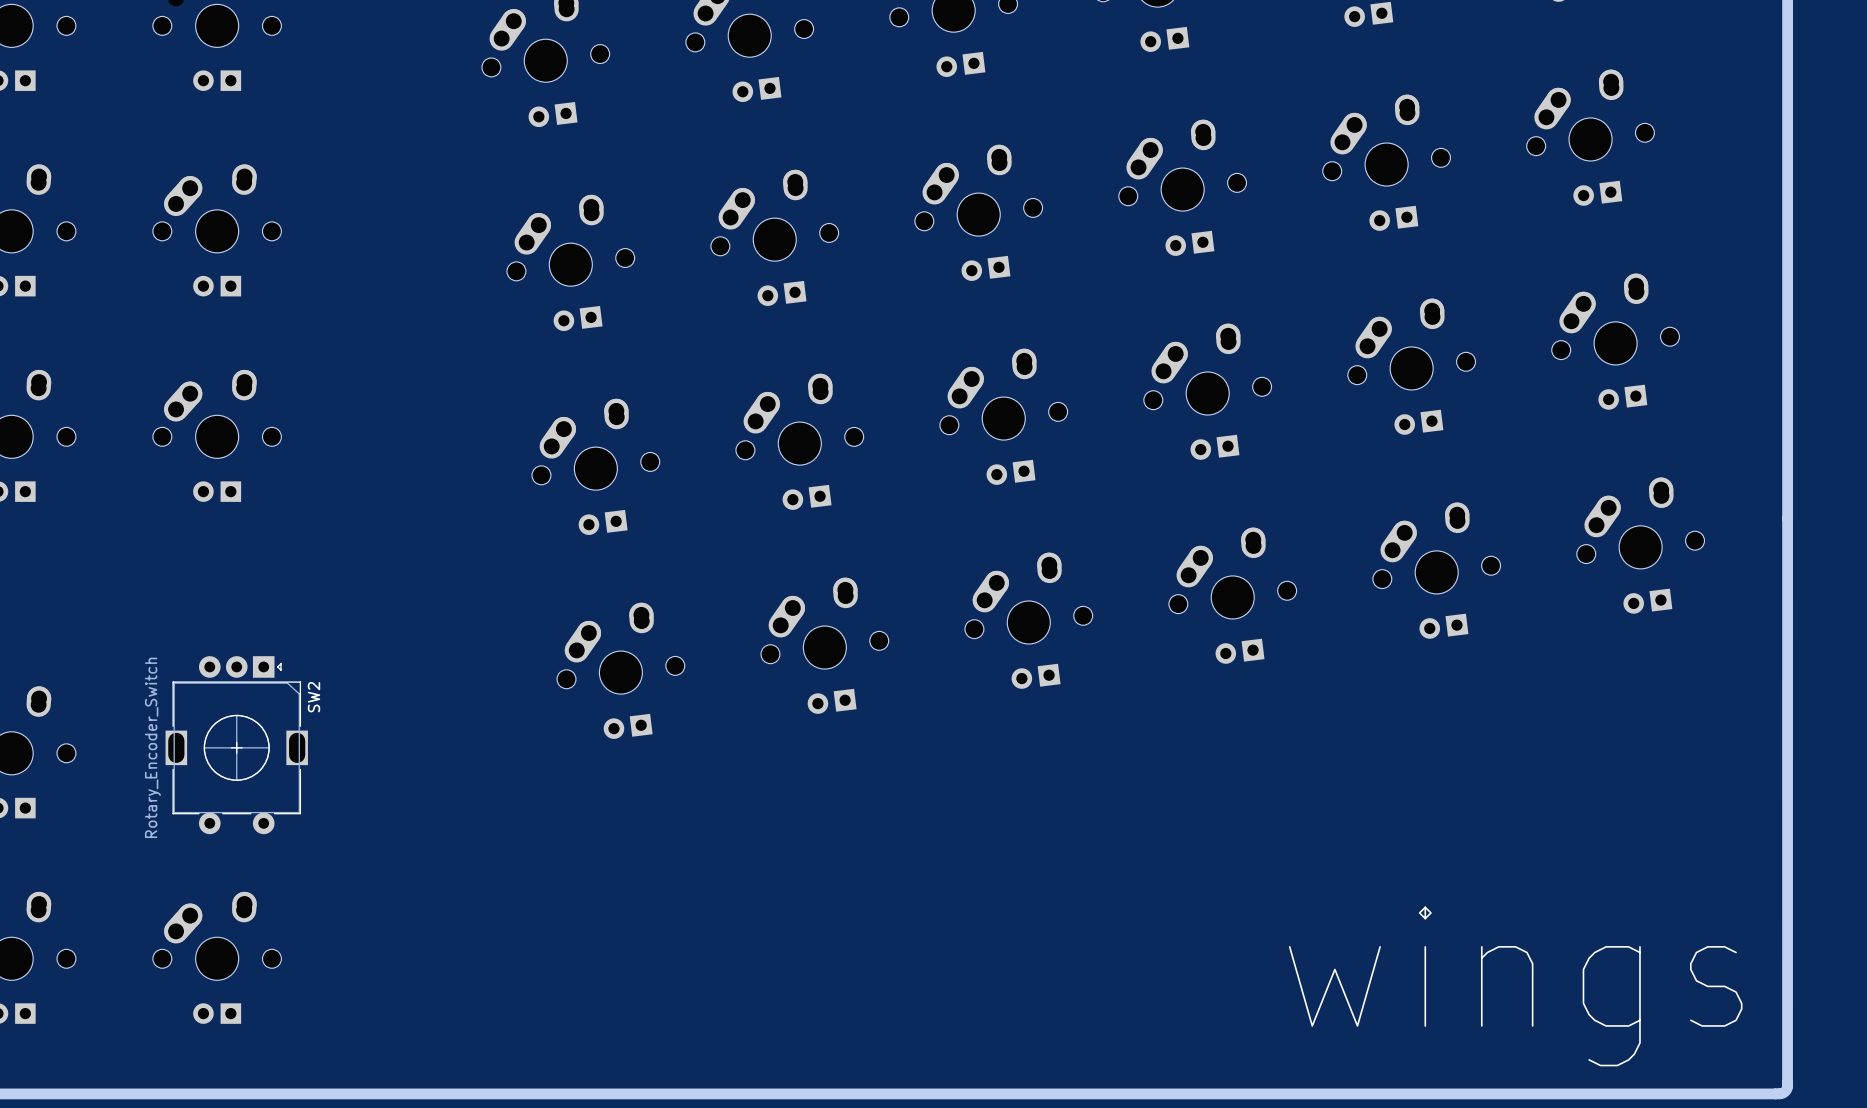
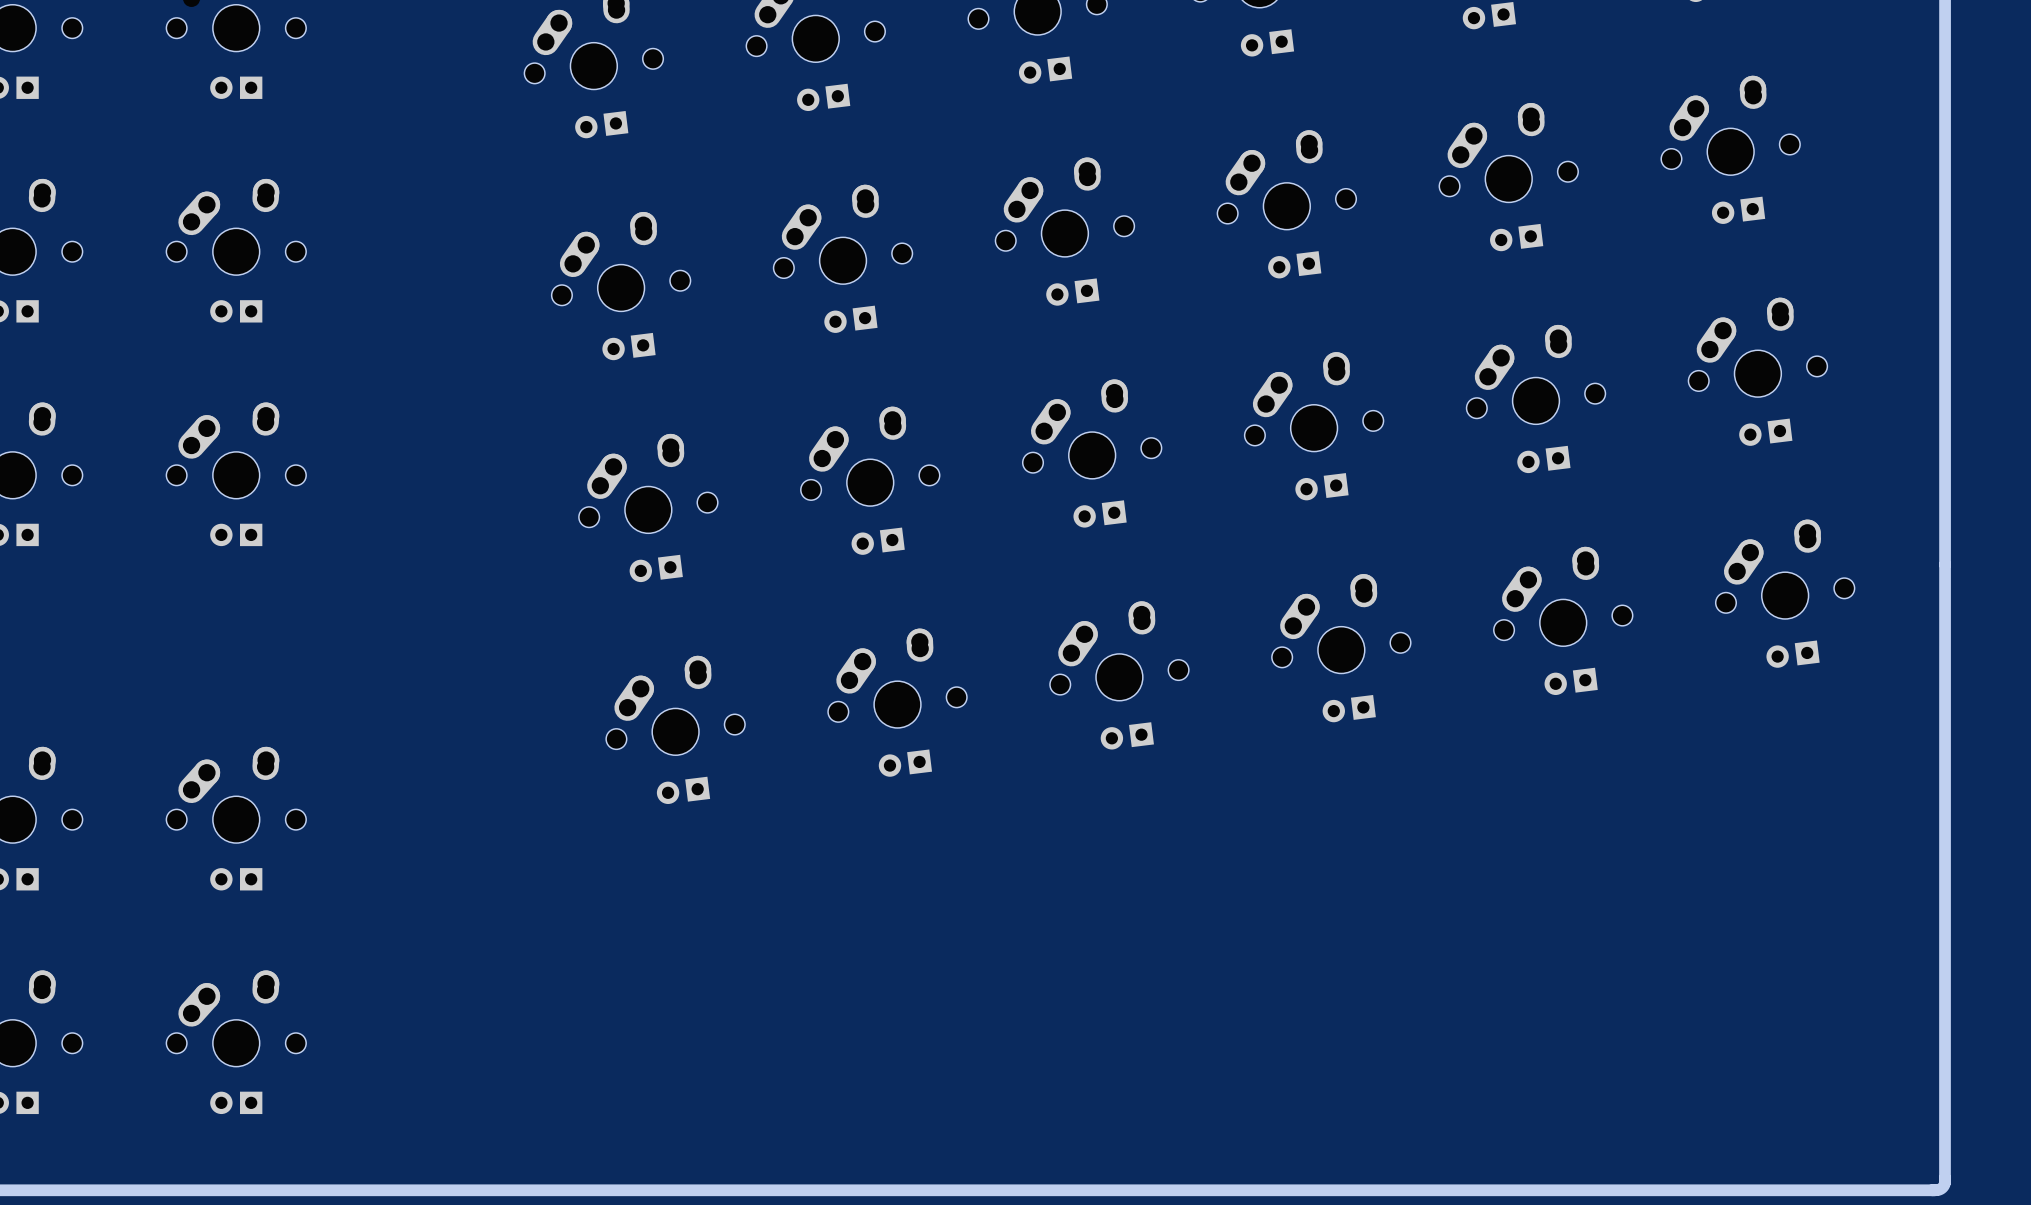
SW2: Rotary_Encoder_Switch (236, 745) -> none
part: none -> (236, 818)
text: wings (1515, 986) -> none

